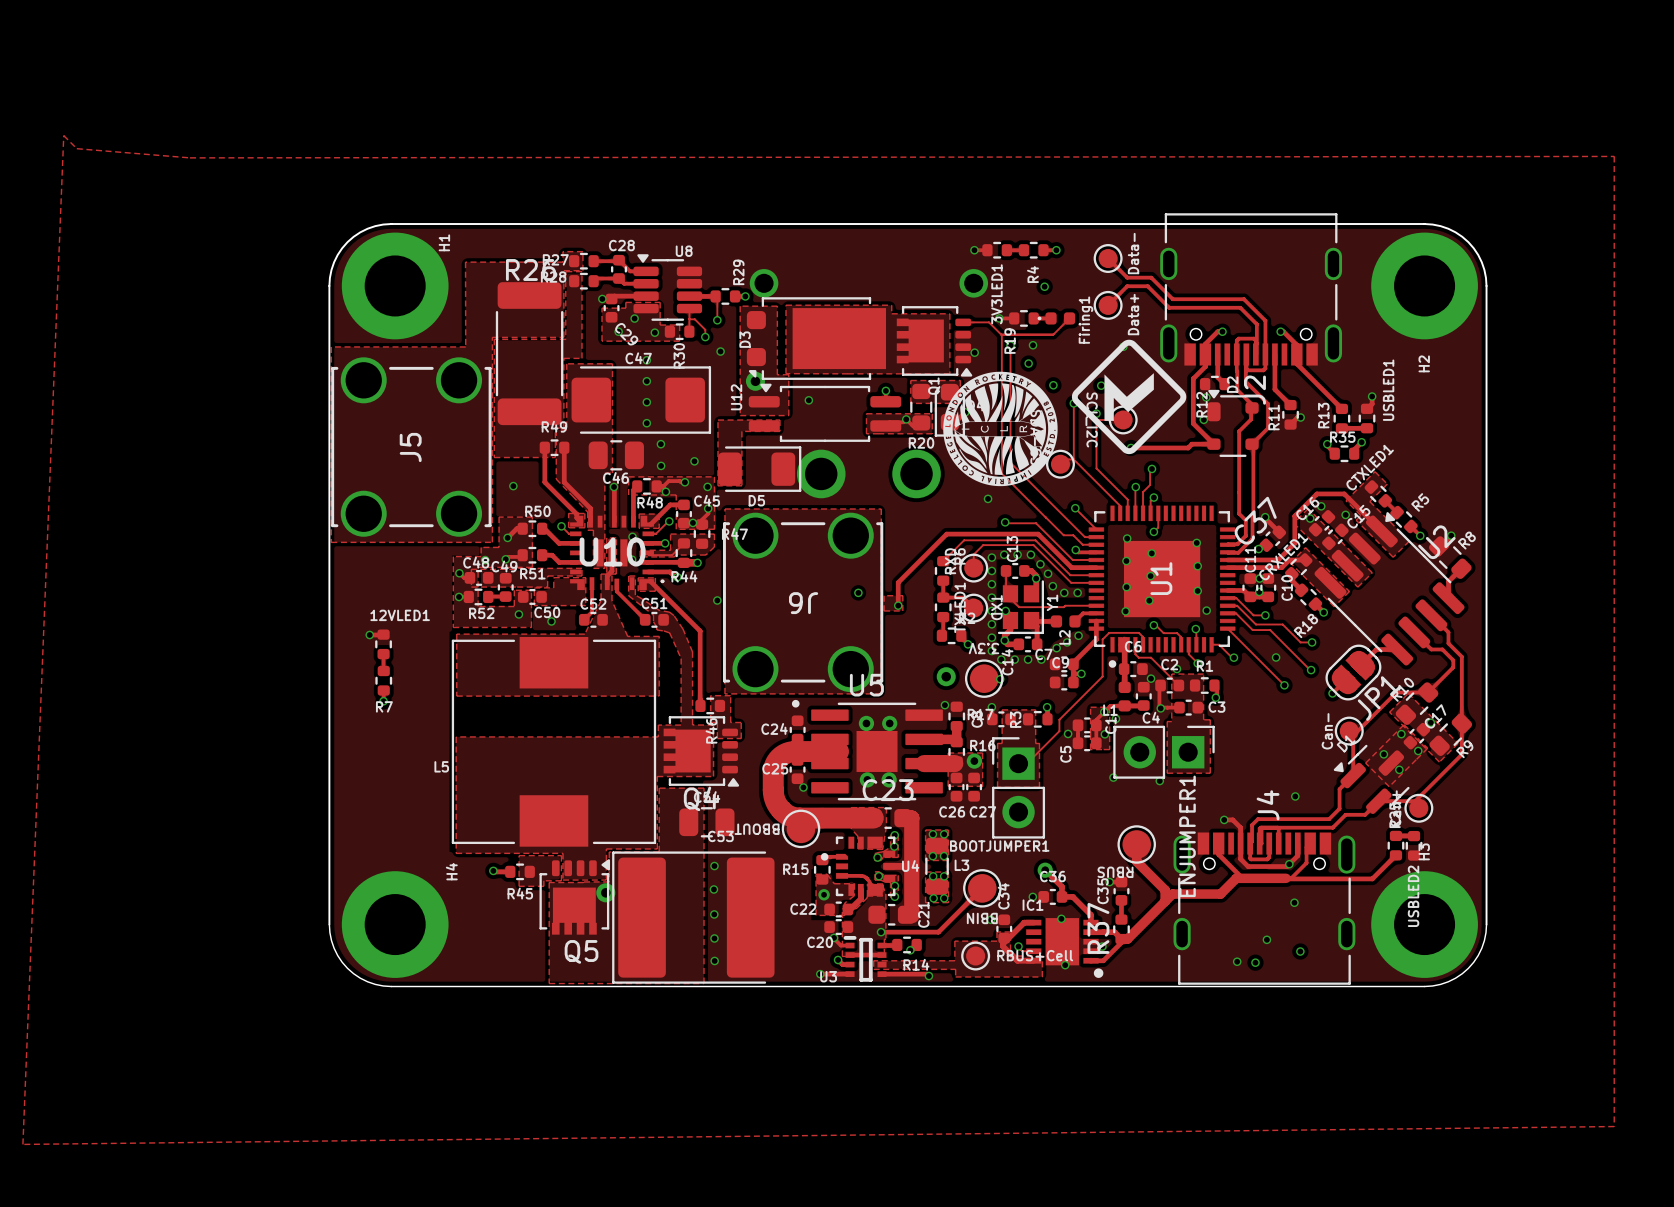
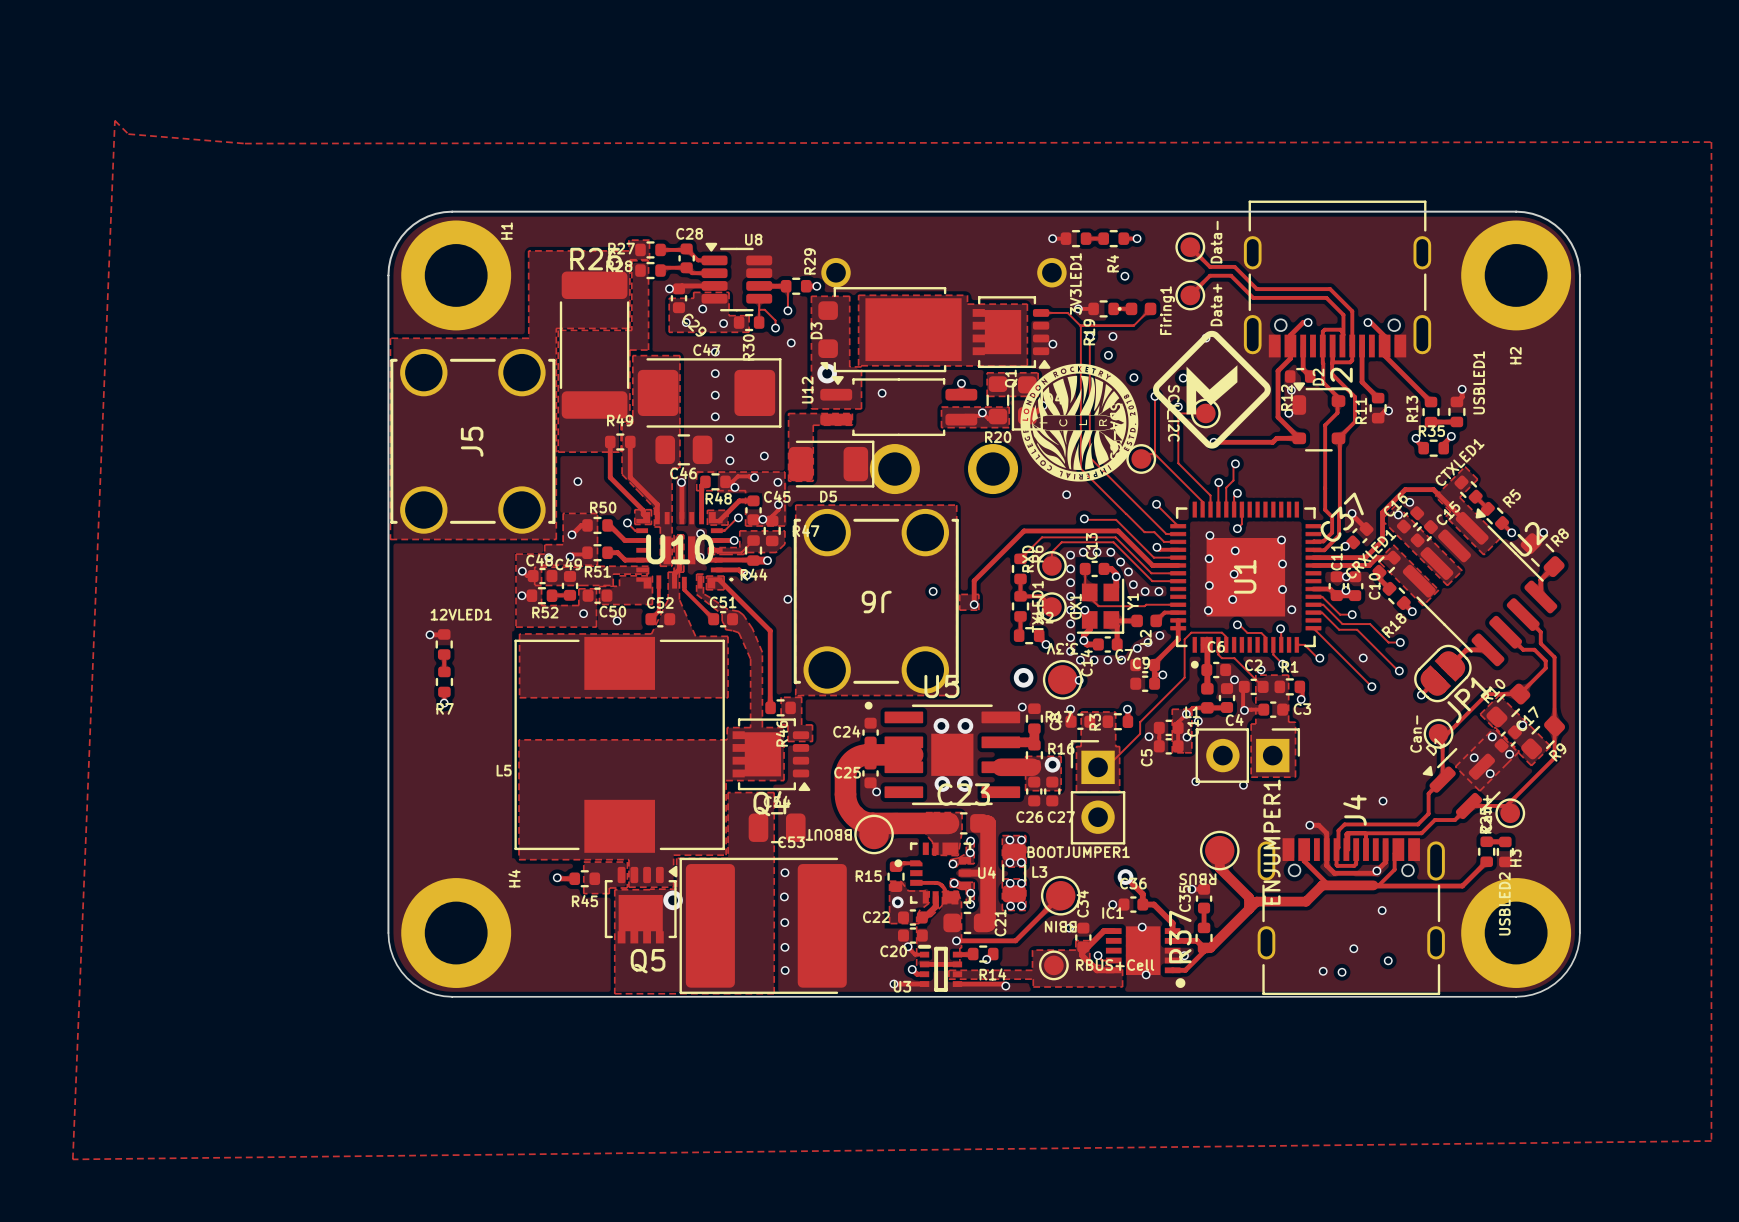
via: (1345, 514) -> none

